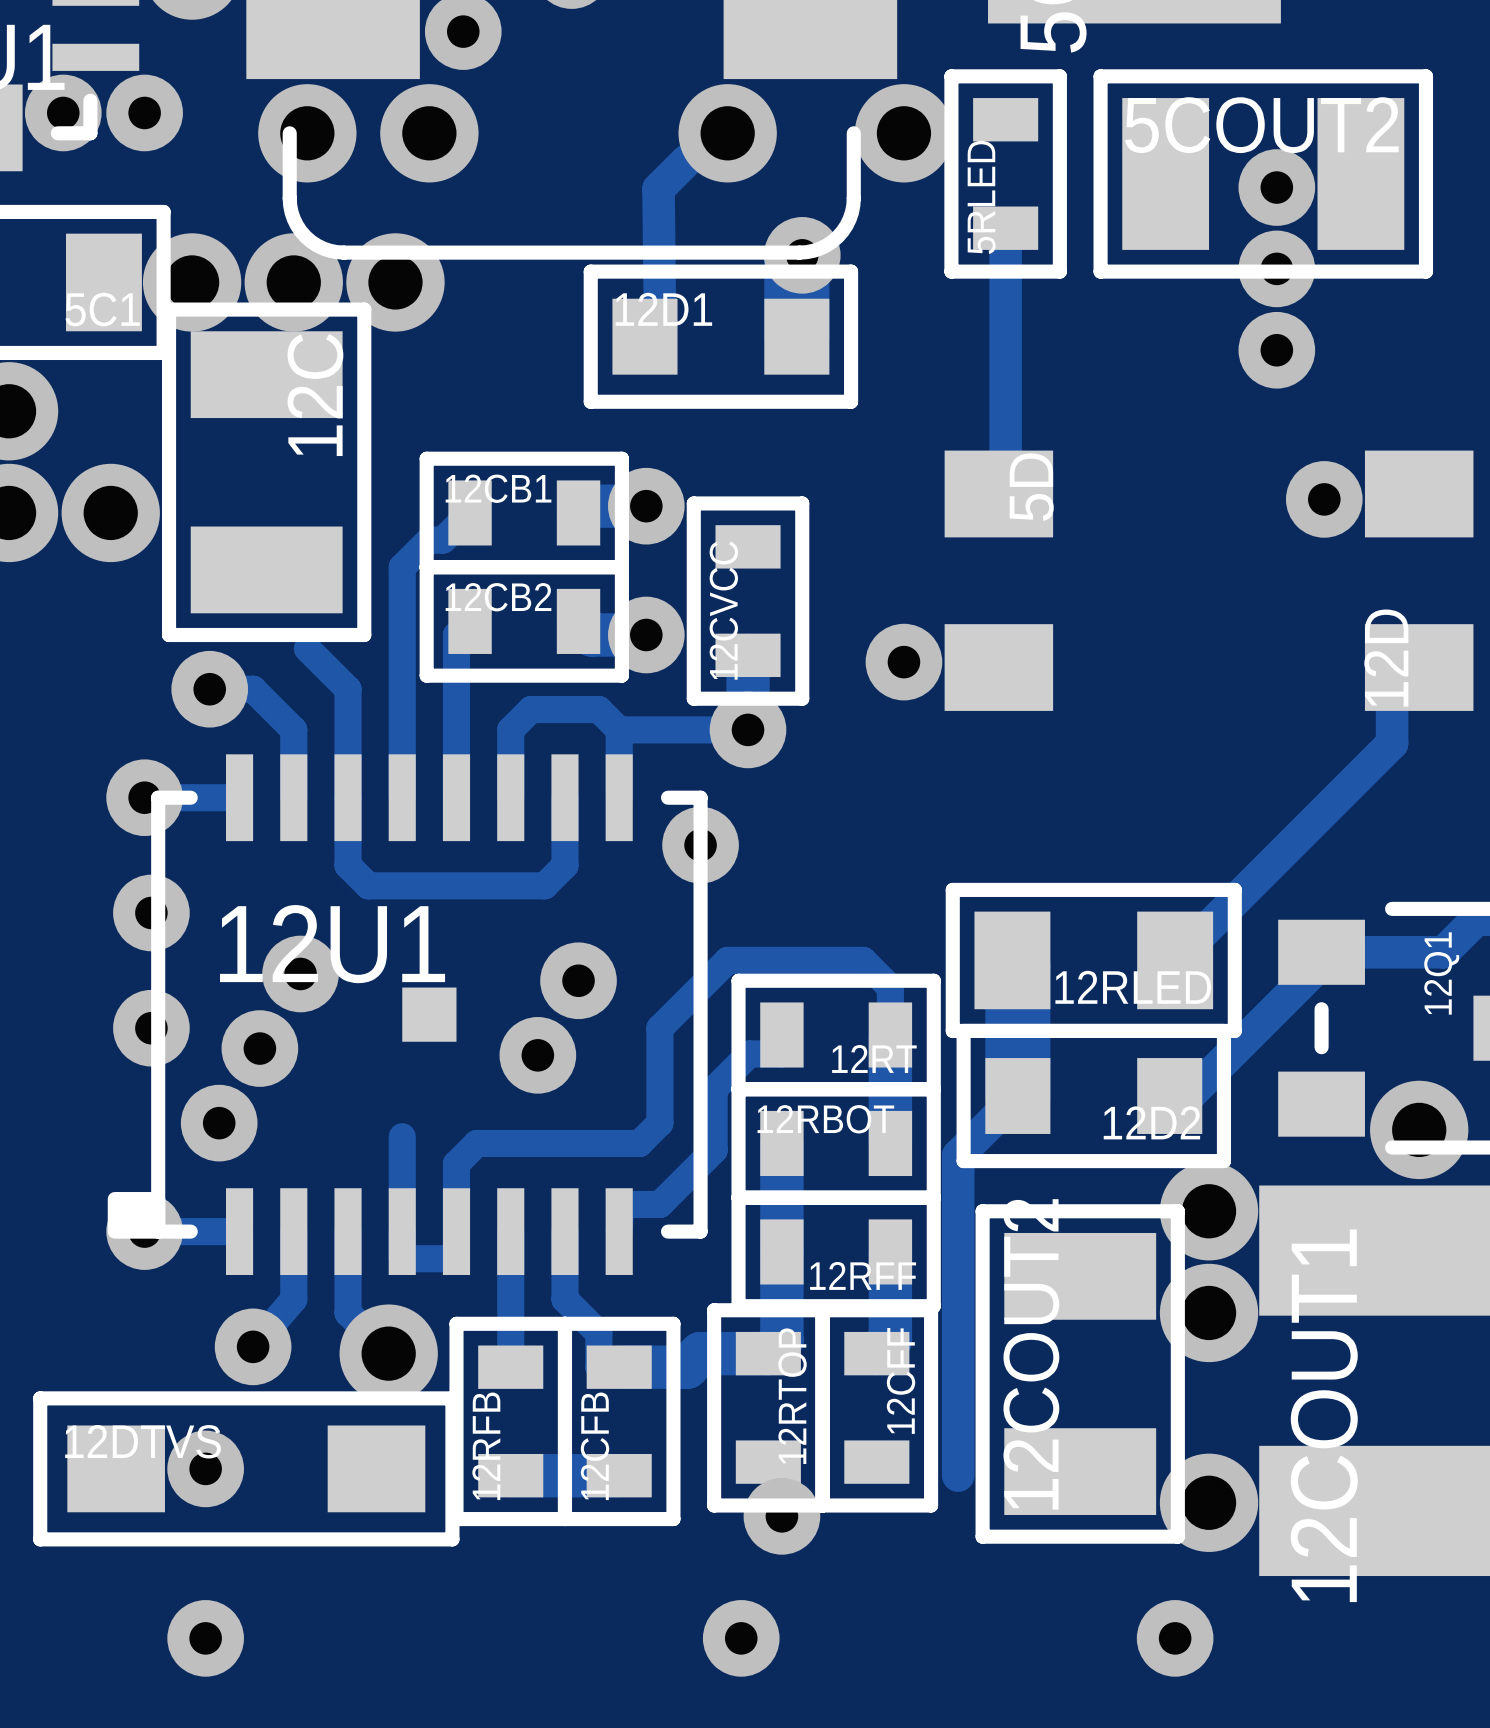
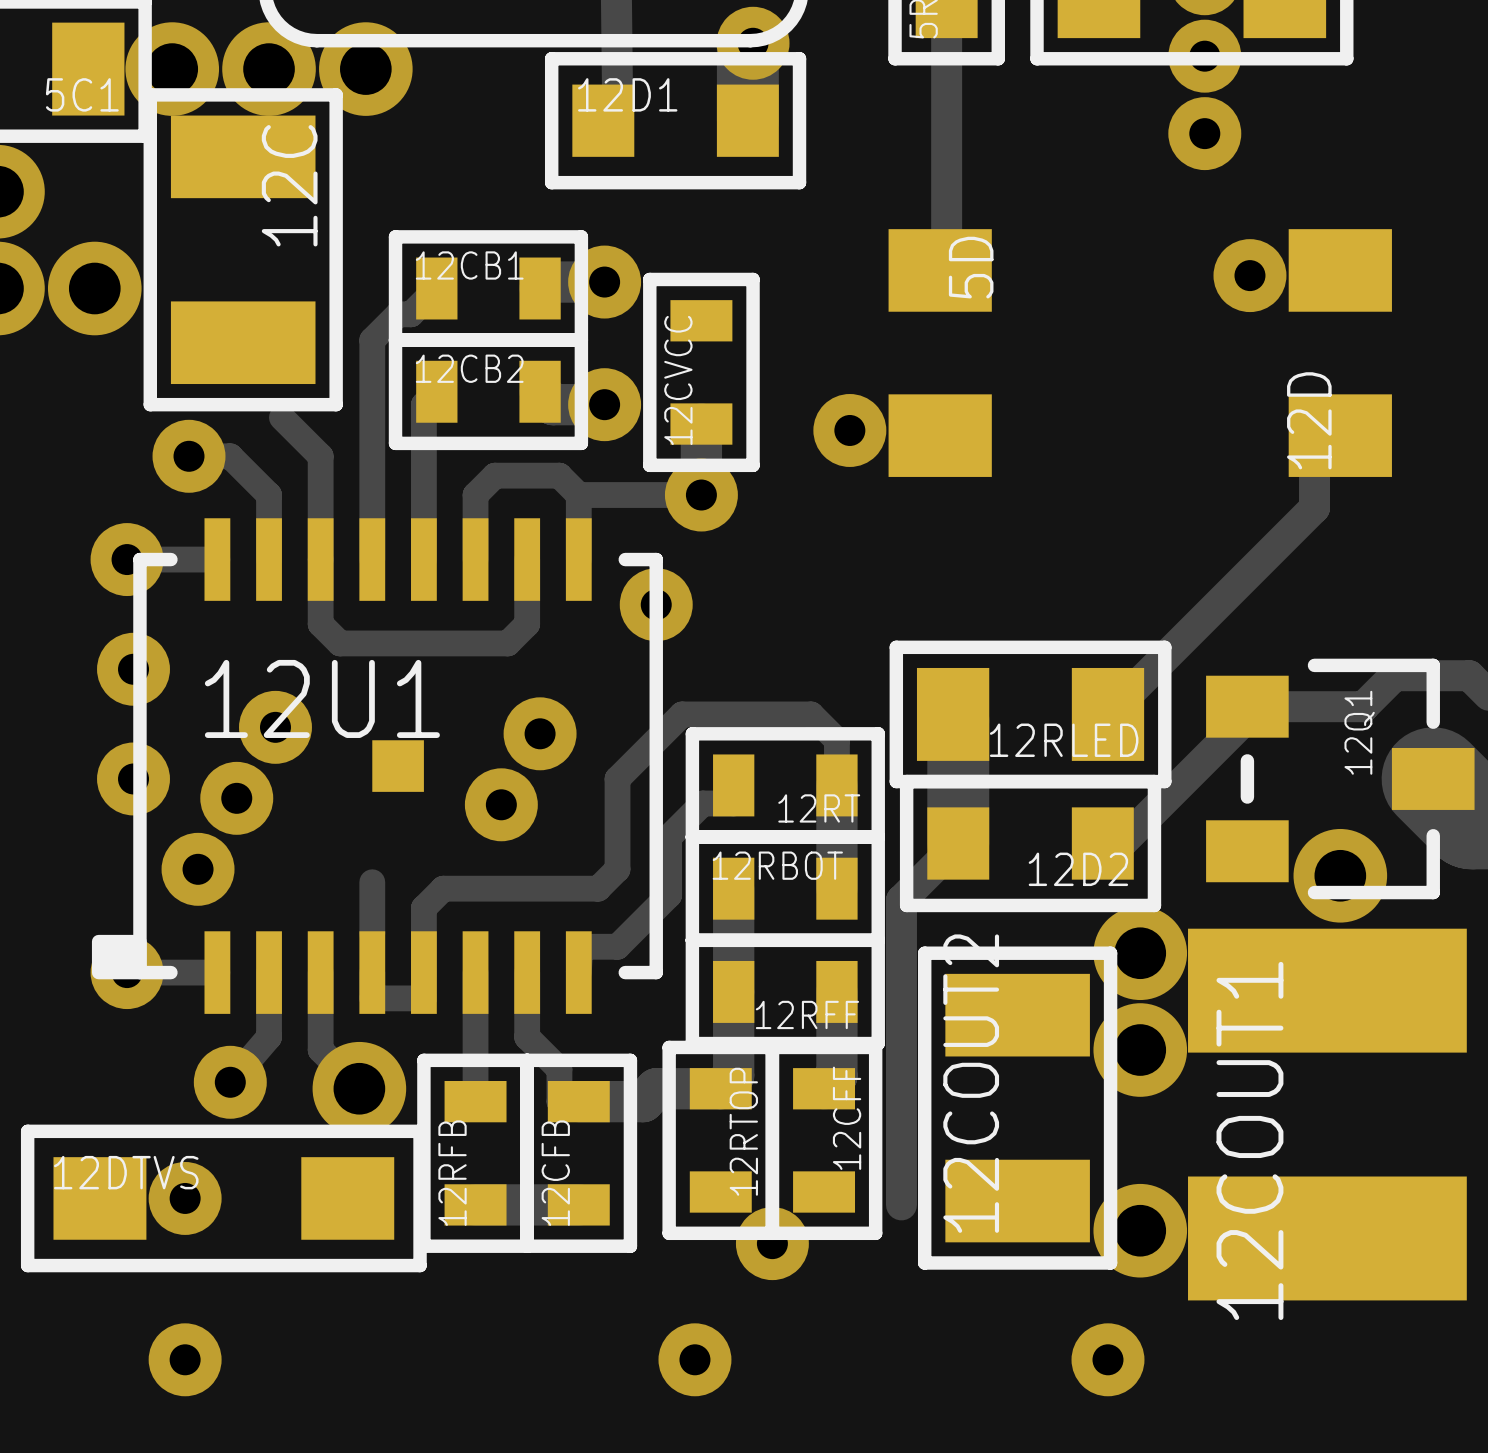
via position: (781, 1516) -> (772, 1243)

